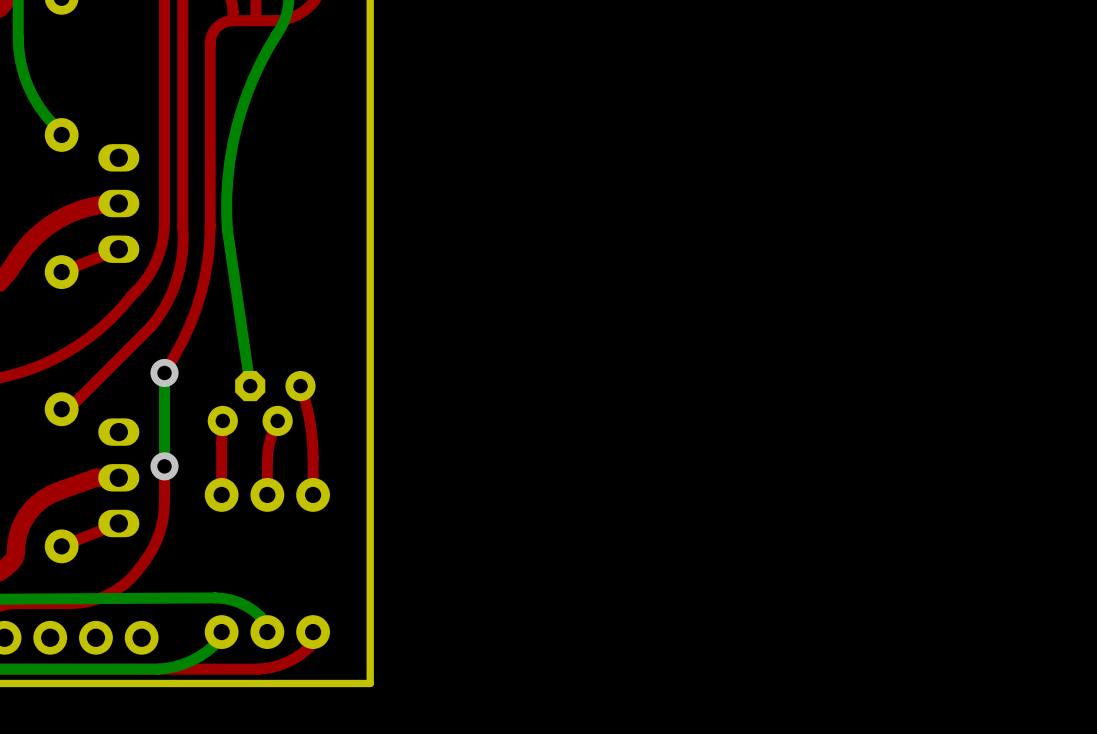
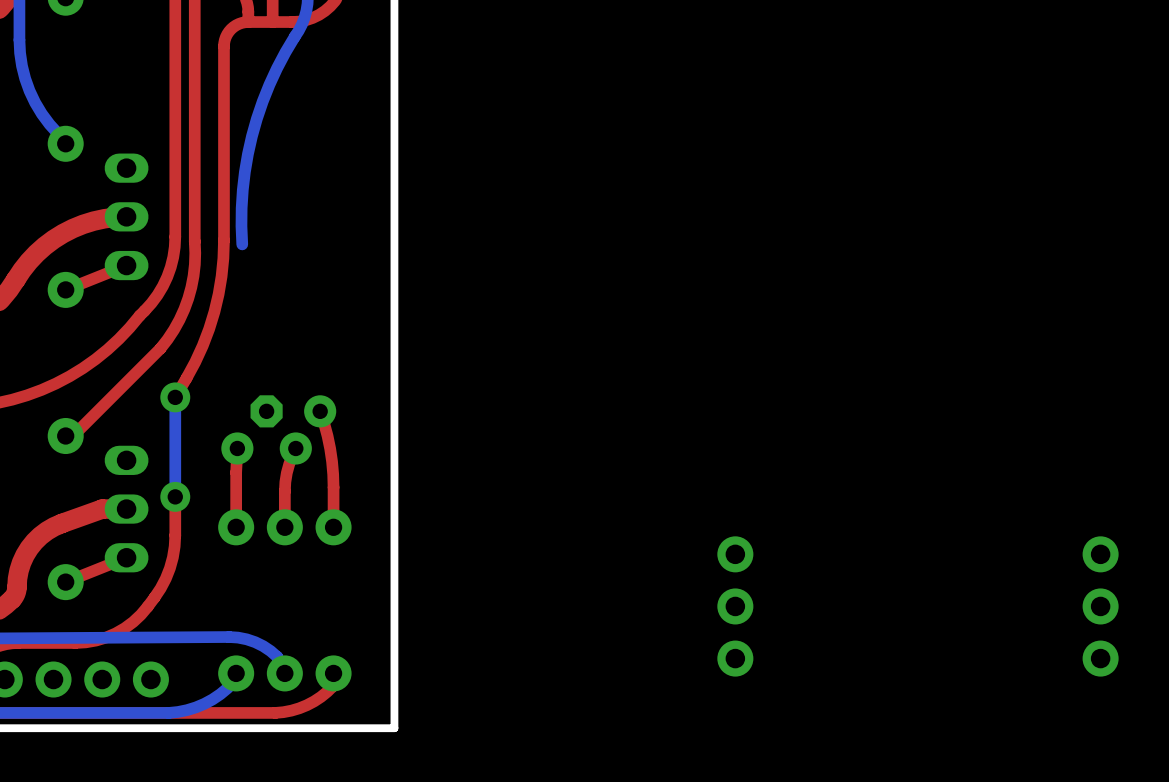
bottom track: (227, 229) (250, 386) -> none
part: none -> (735, 606)
part: none -> (1100, 606)

